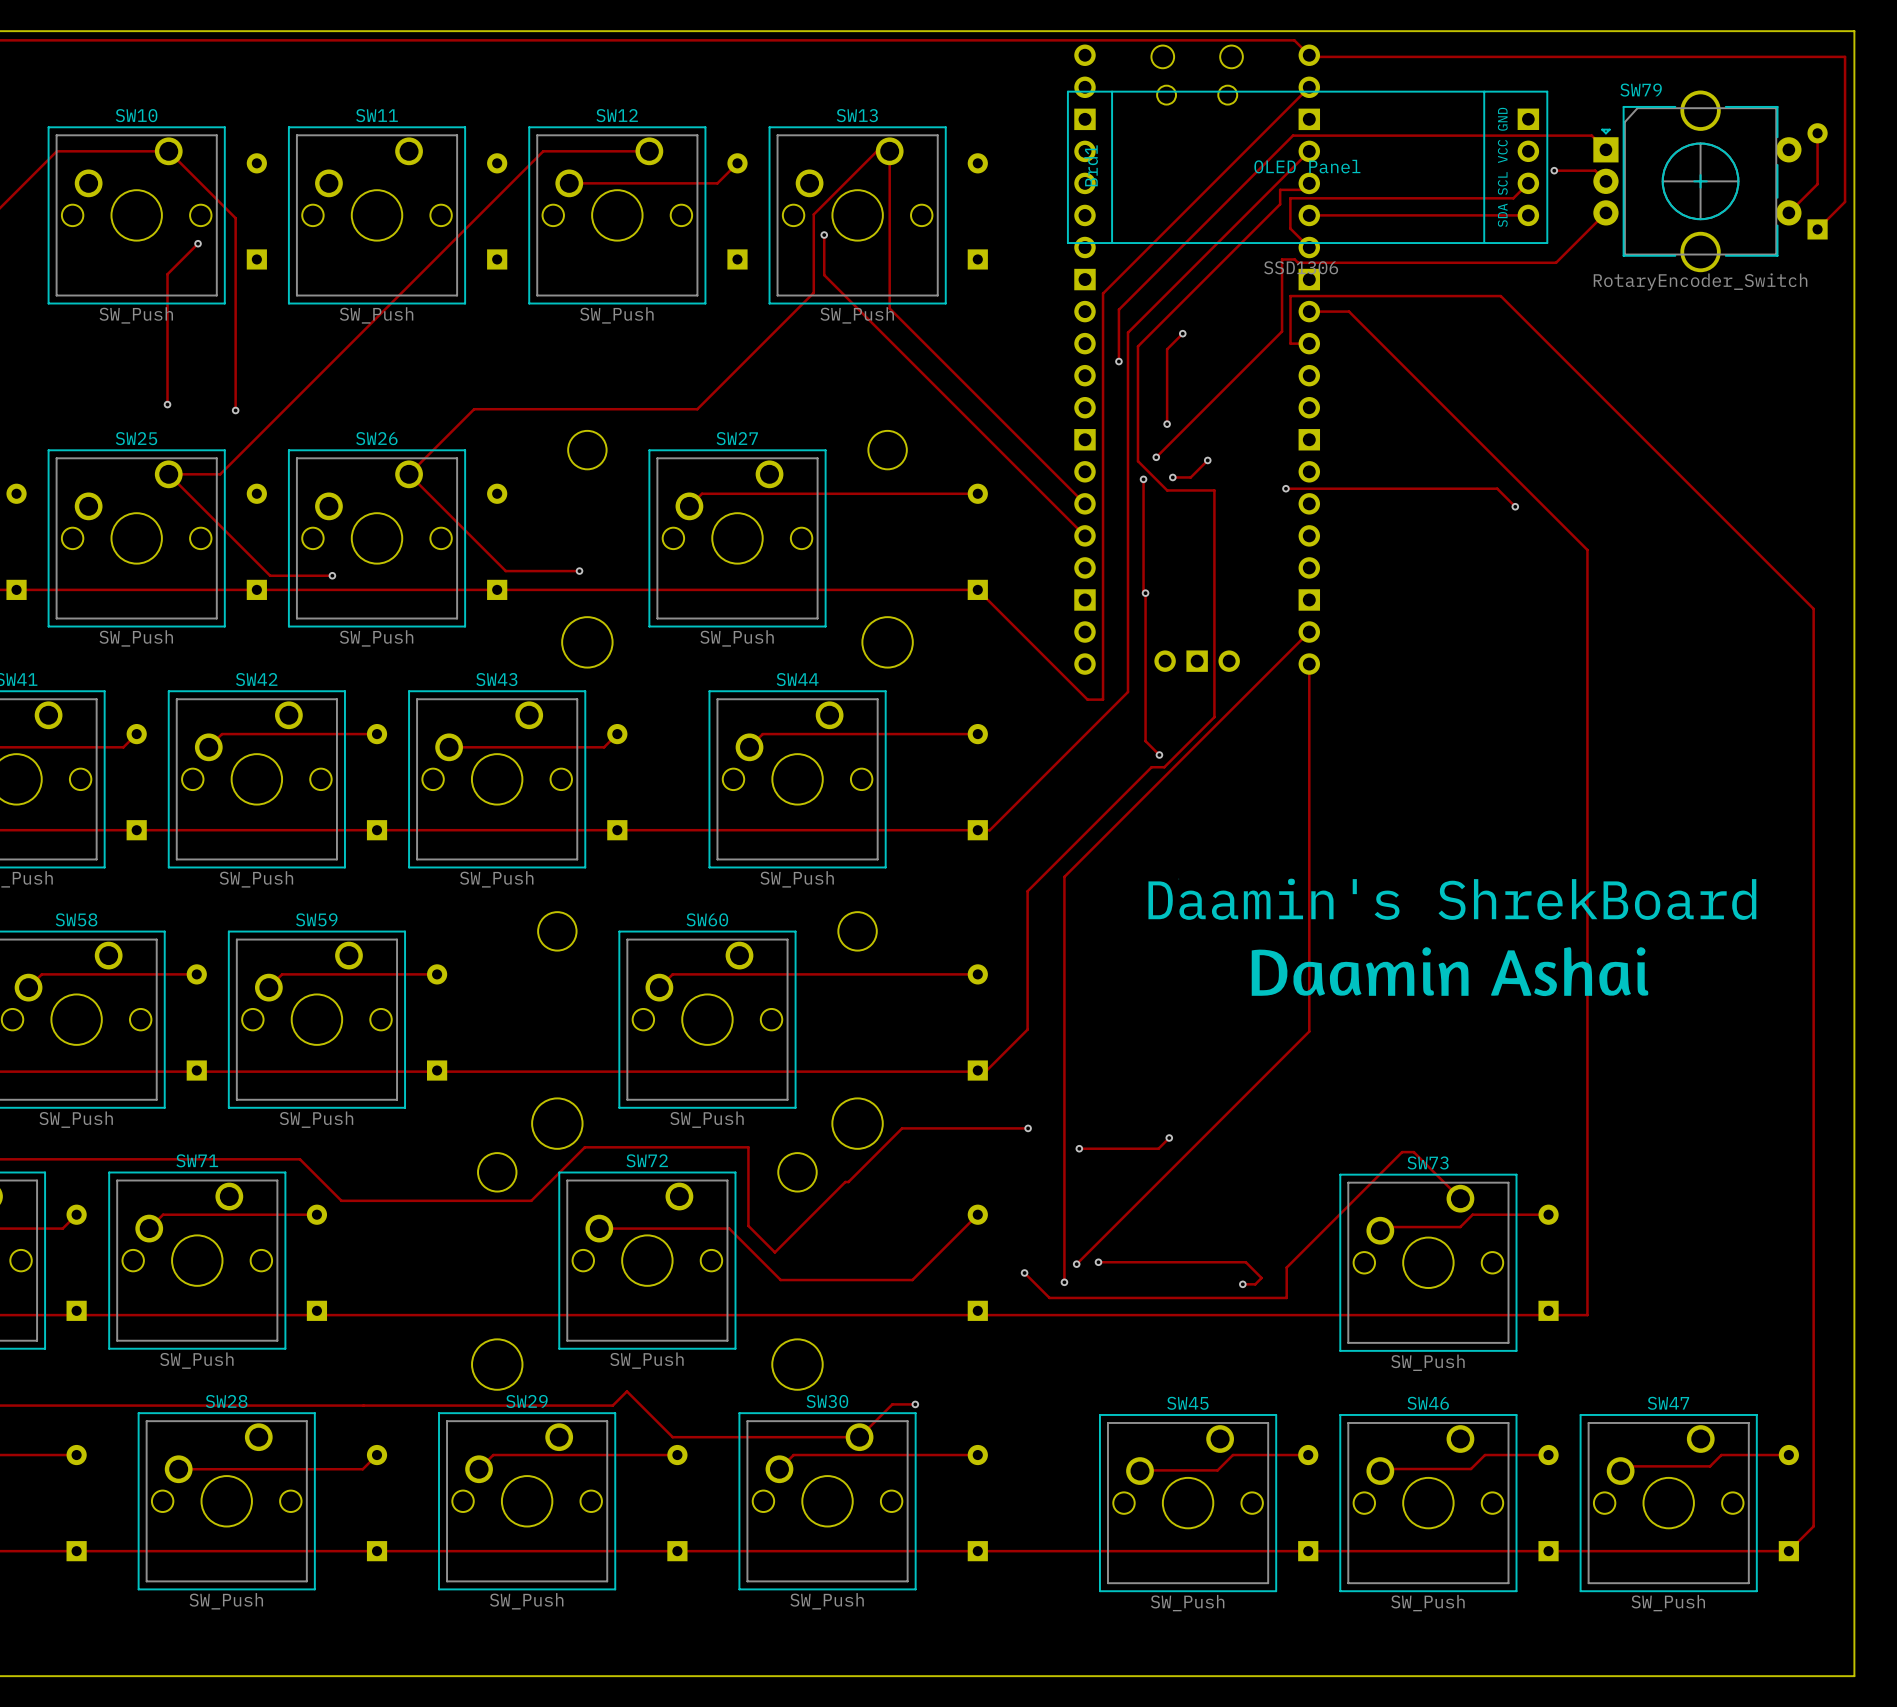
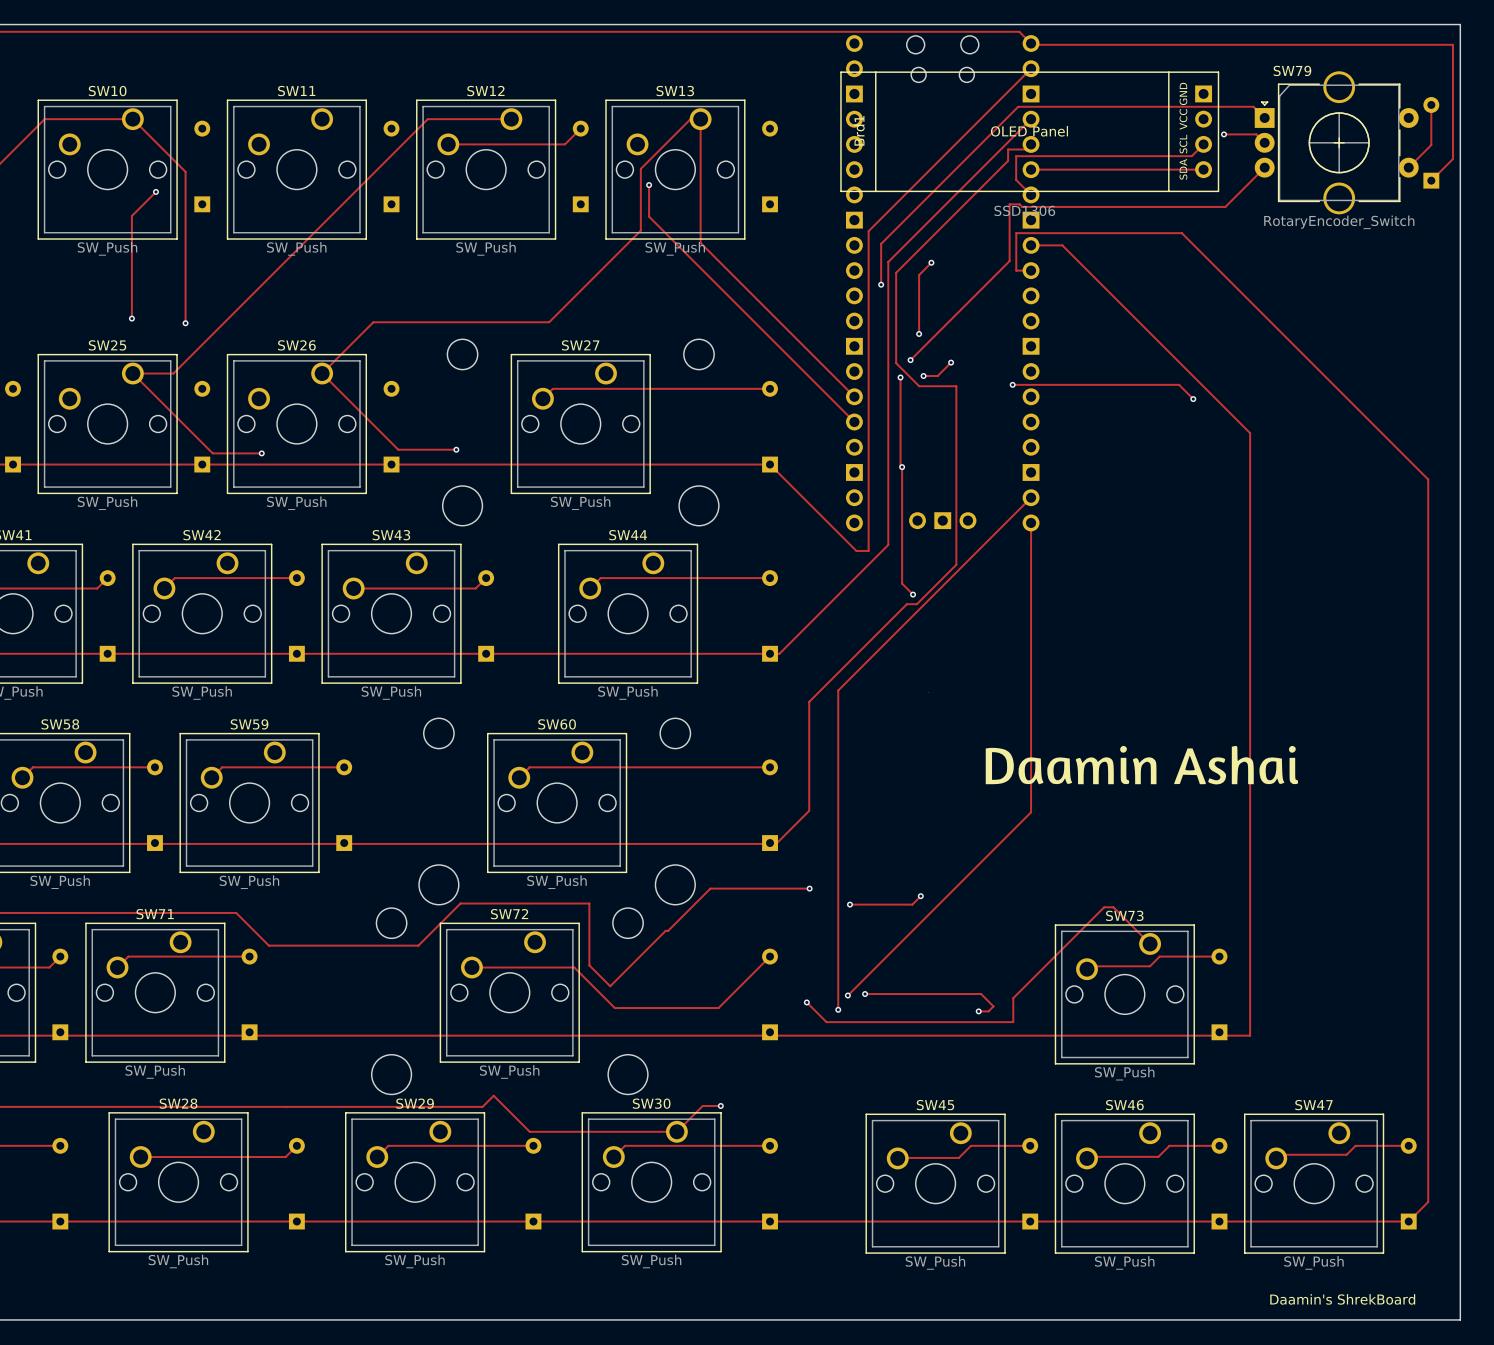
text: Daamin's ShrekBoard (1452, 899) -> none
text: none -> Daamin's ShrekBoard (1342, 1299)

